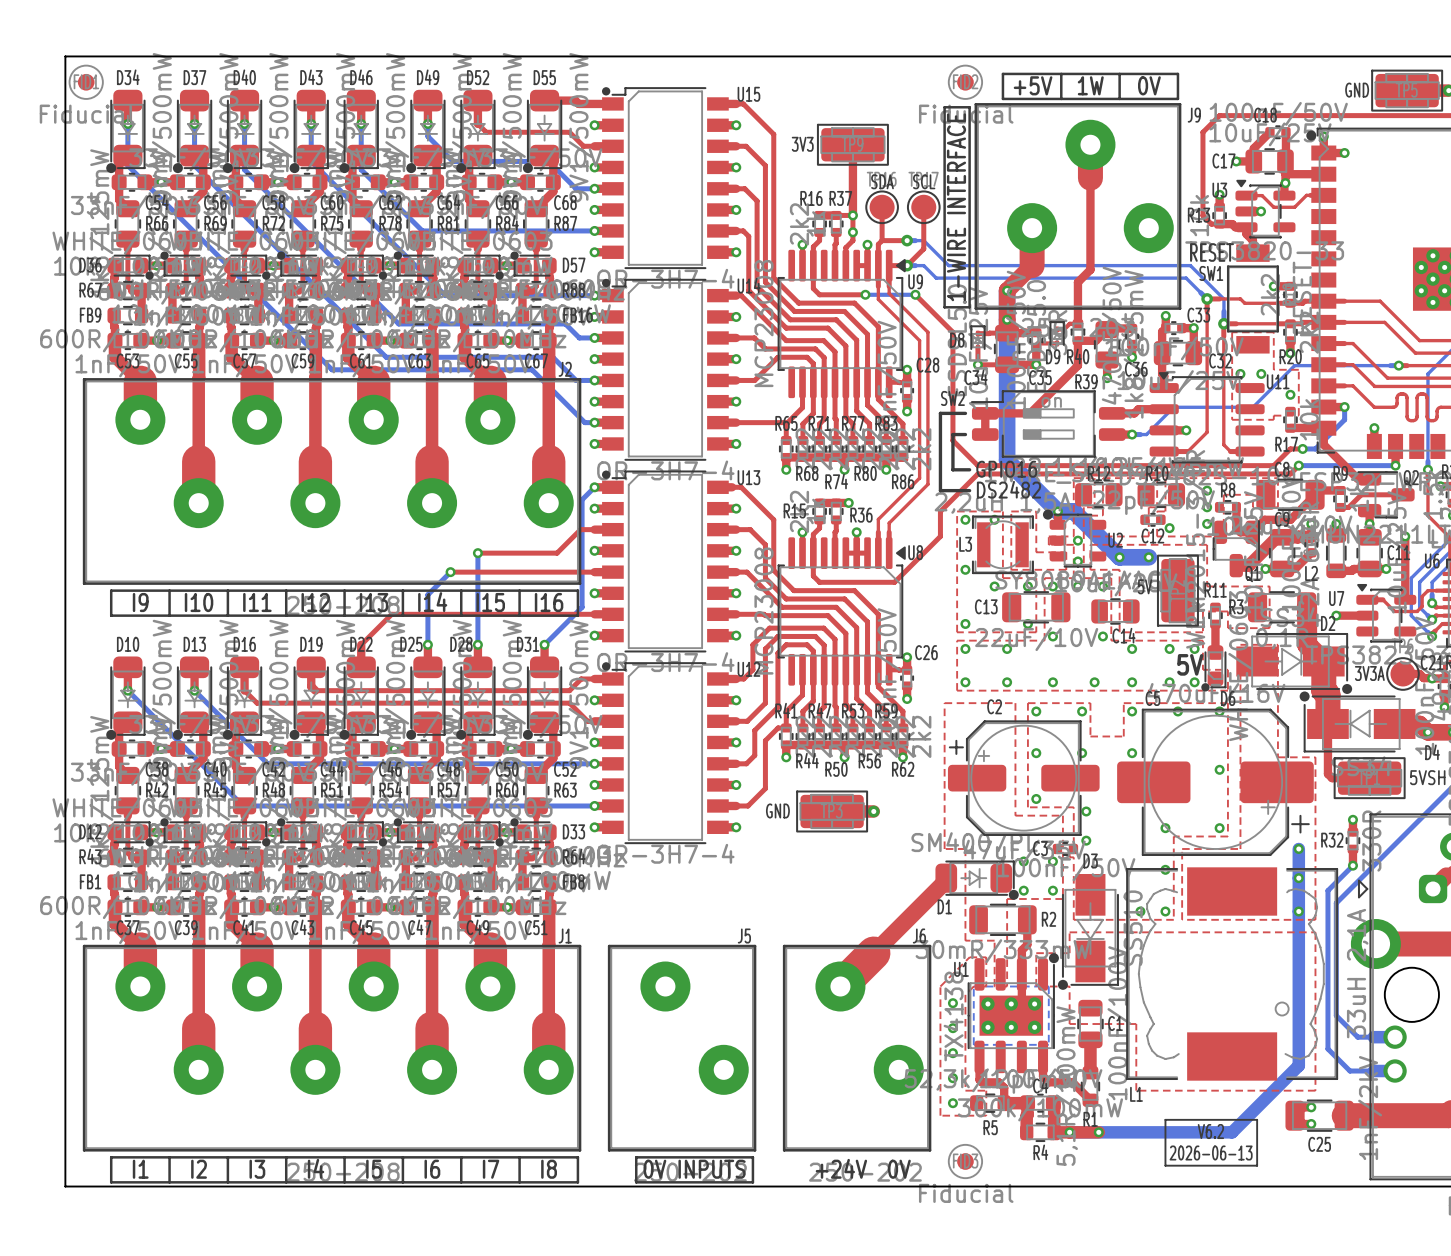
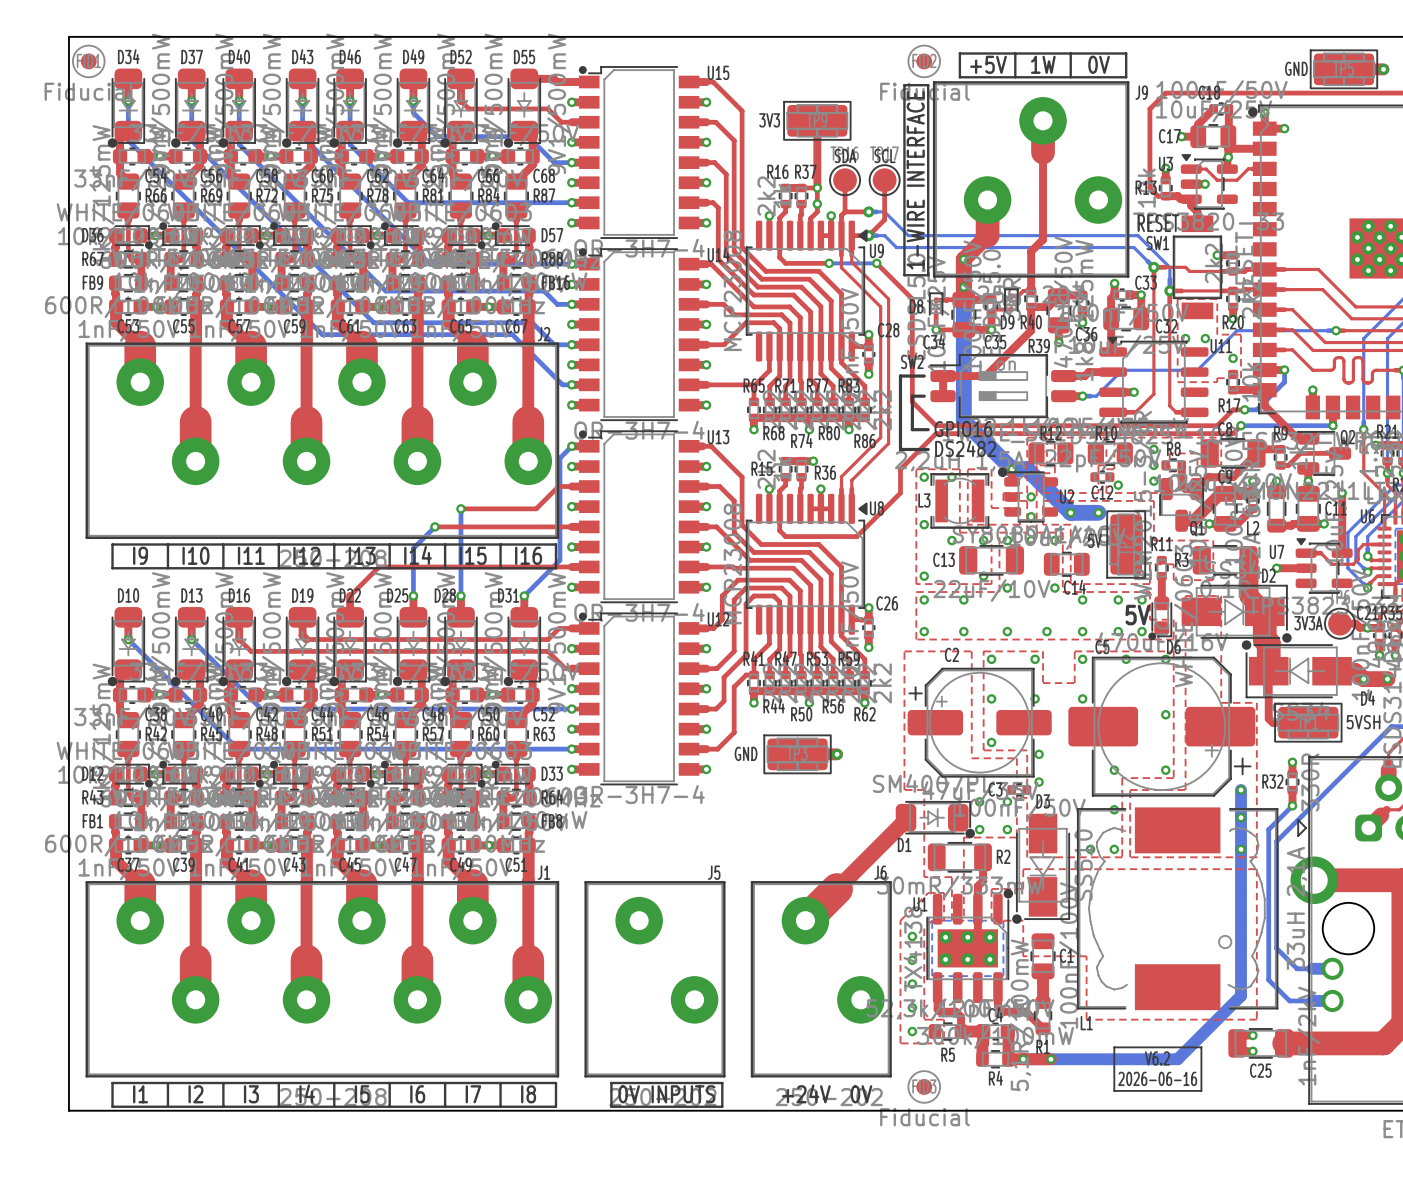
text: 2026-06-13 (1211, 1153) -> 2026-06-16 (1157, 1078)

